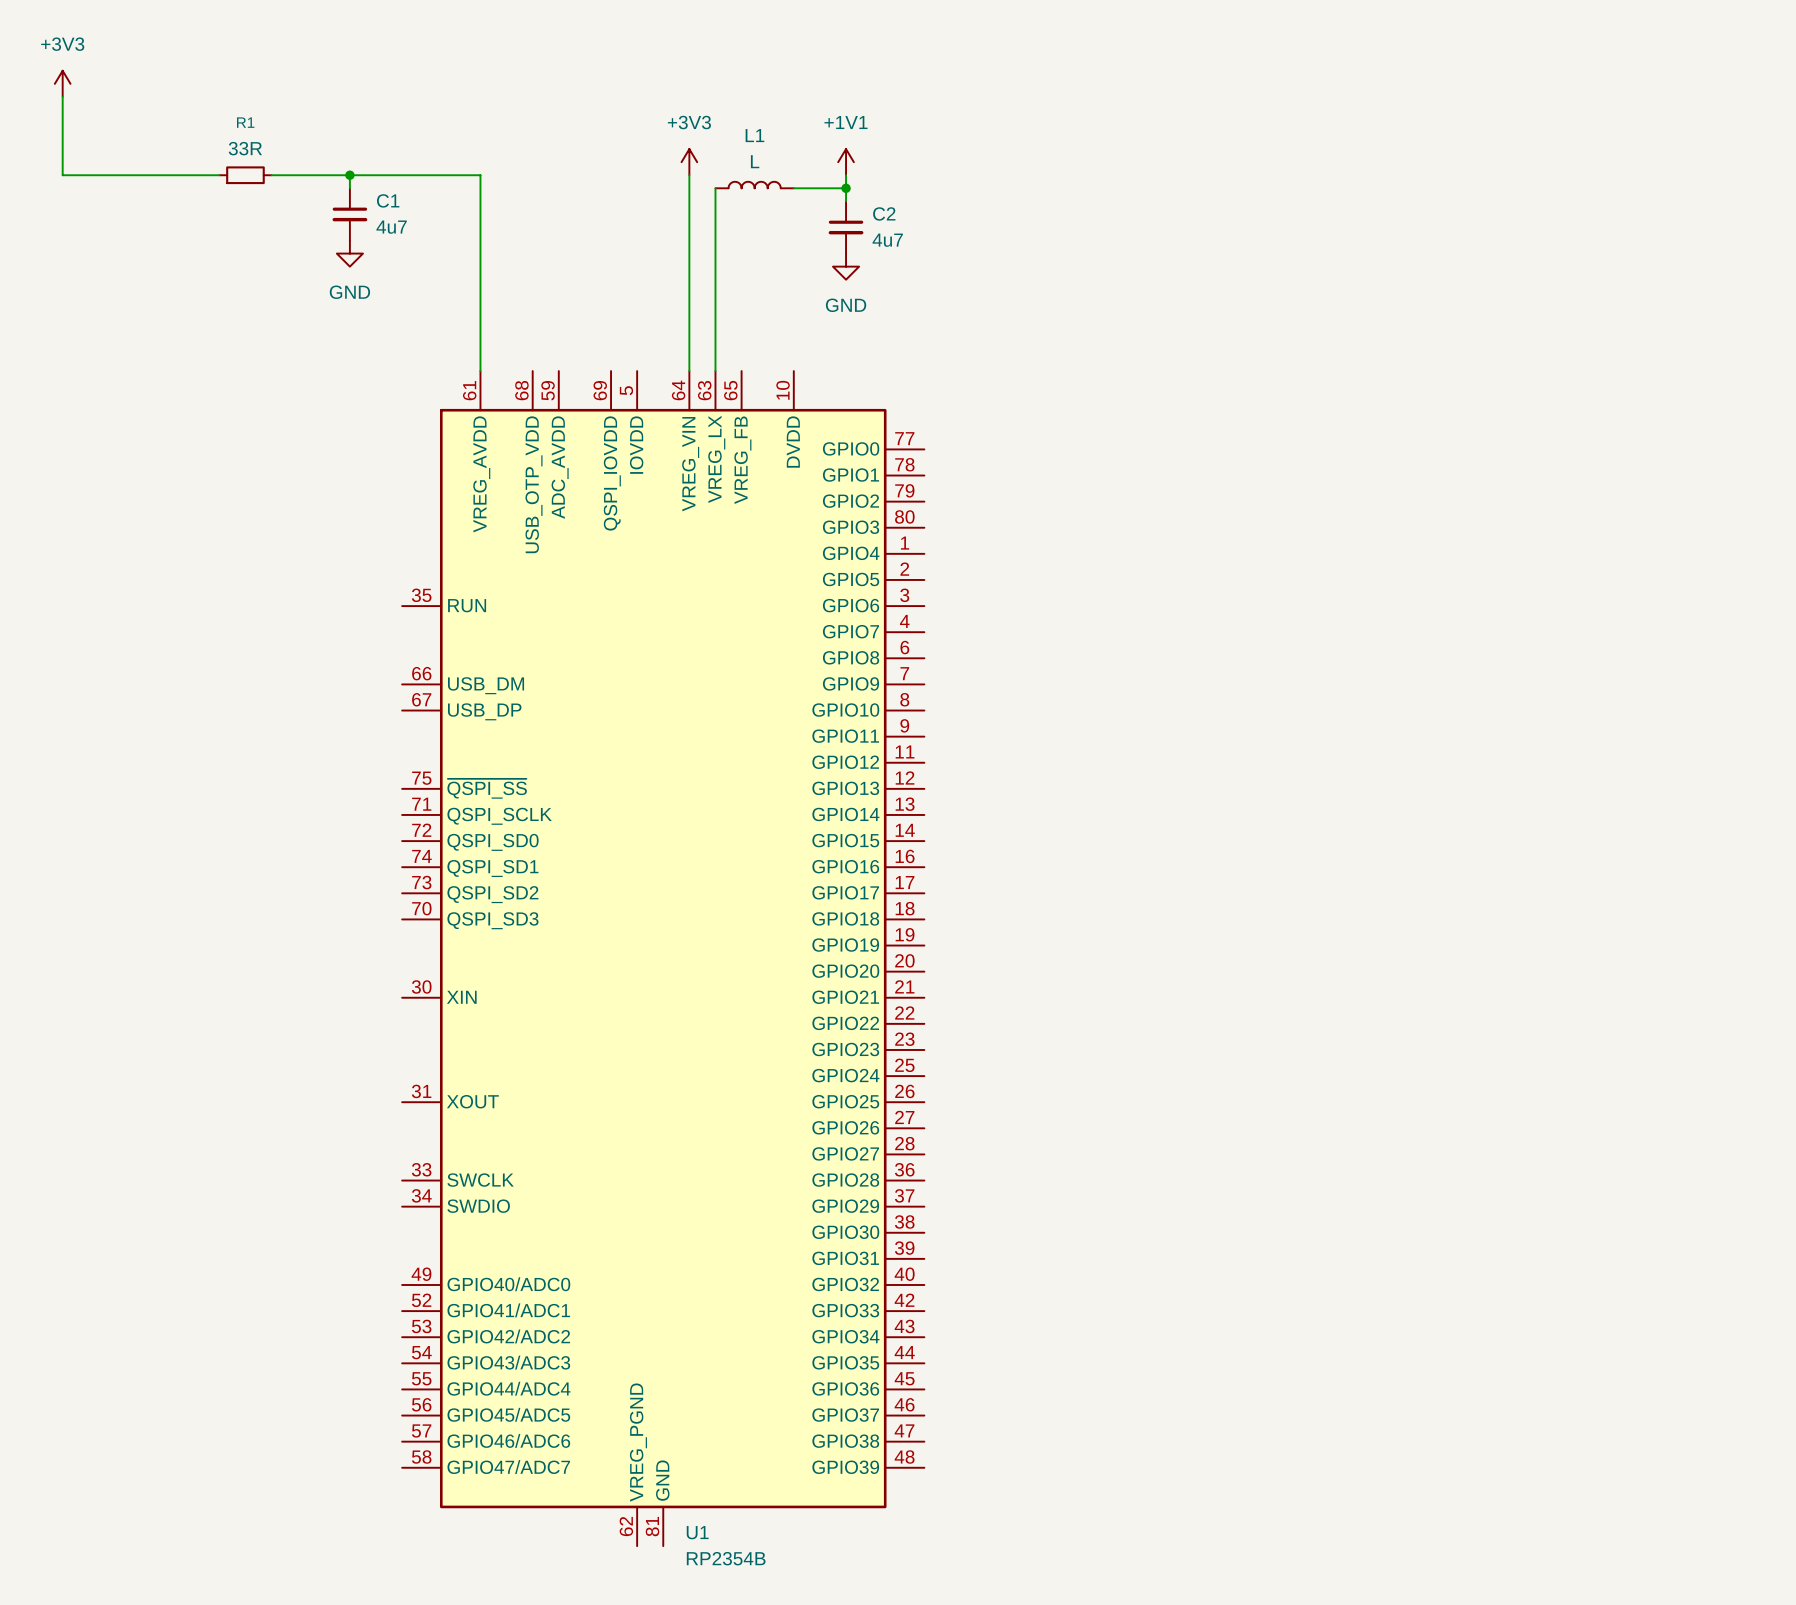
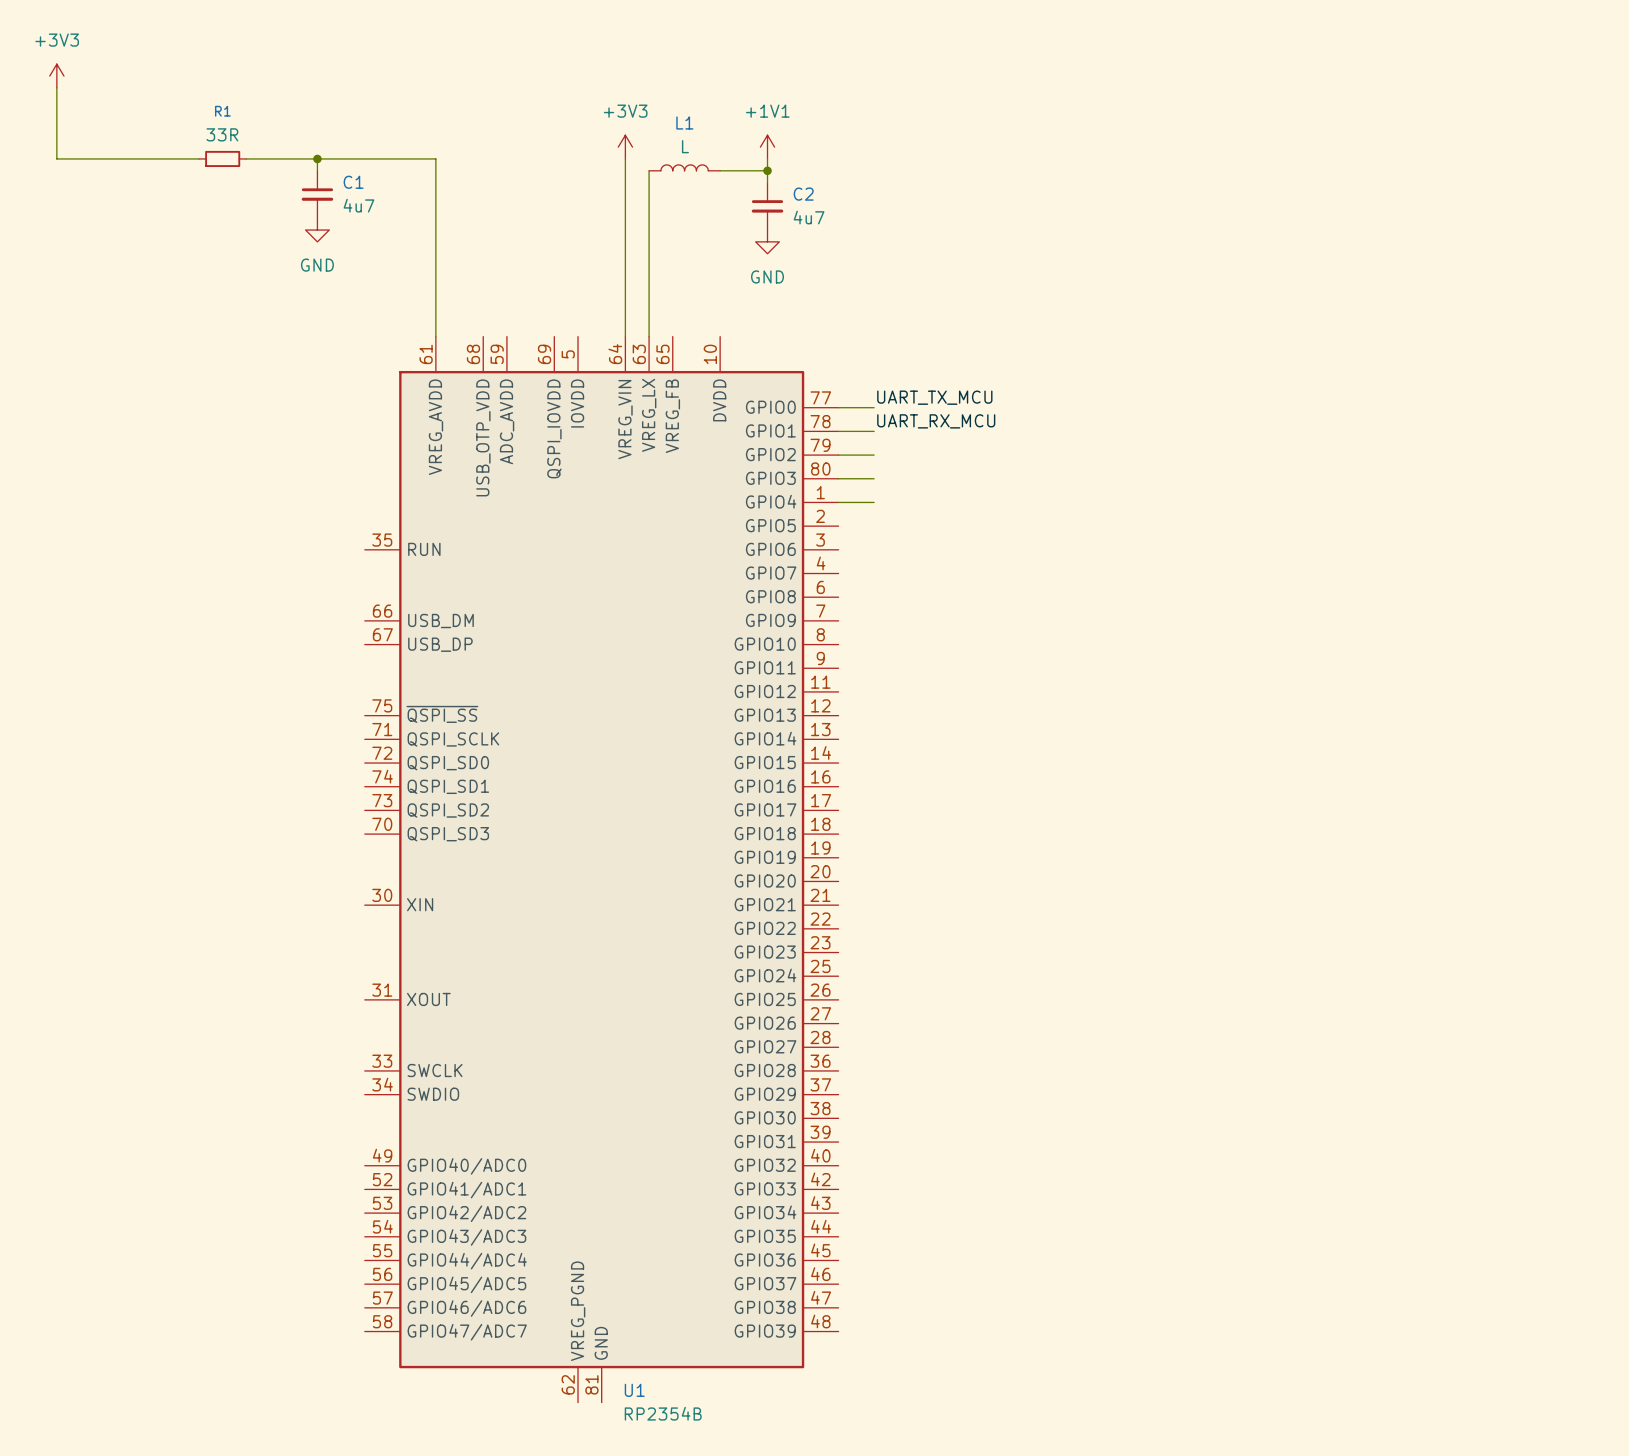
label: none -> UART_TX_MCU (934, 397)
wire: none -> (838, 407) (874, 407)
label: none -> UART_RX_MCU (936, 421)
wire: none -> (838, 431) (874, 431)
wire: none -> (838, 455) (874, 455)
wire: none -> (838, 478) (874, 478)
wire: none -> (838, 502) (874, 502)

